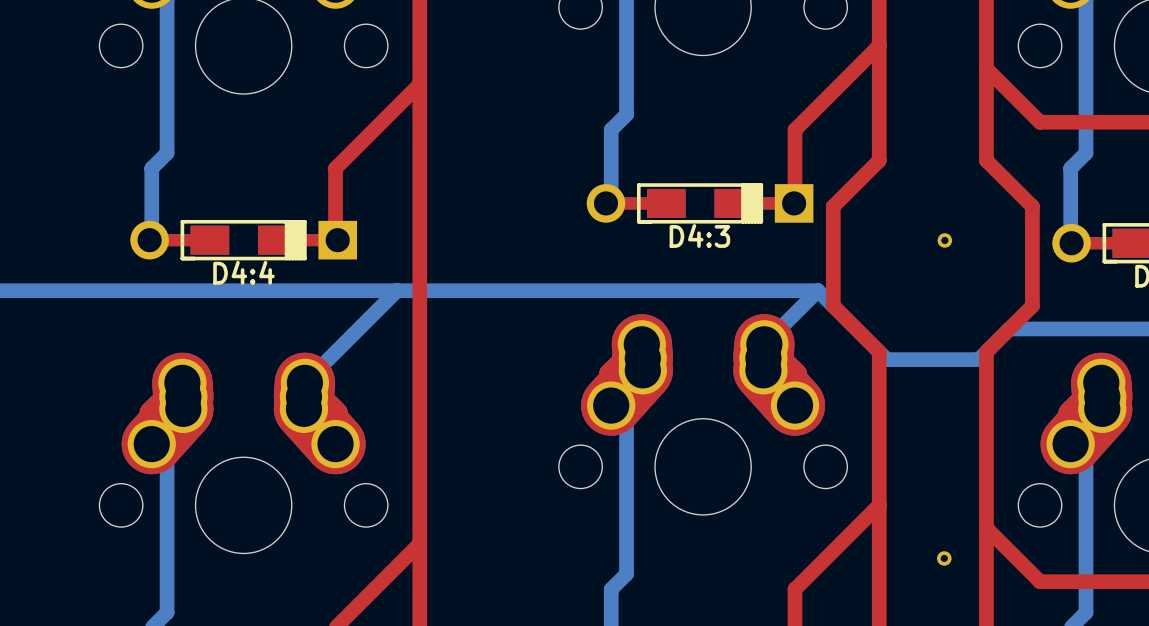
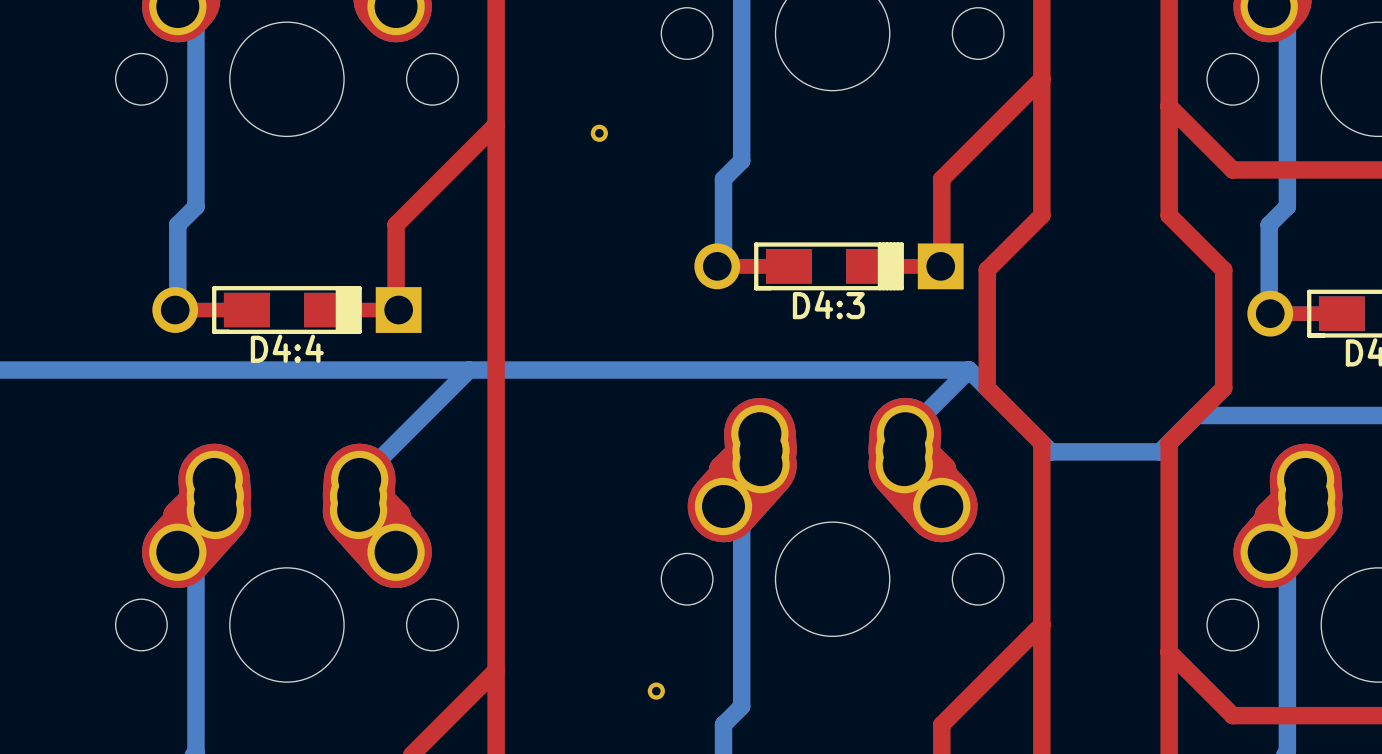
part: none -> (599, 133)
part: (944, 240) -> none
part: (944, 558) -> none
part: none -> (656, 691)

